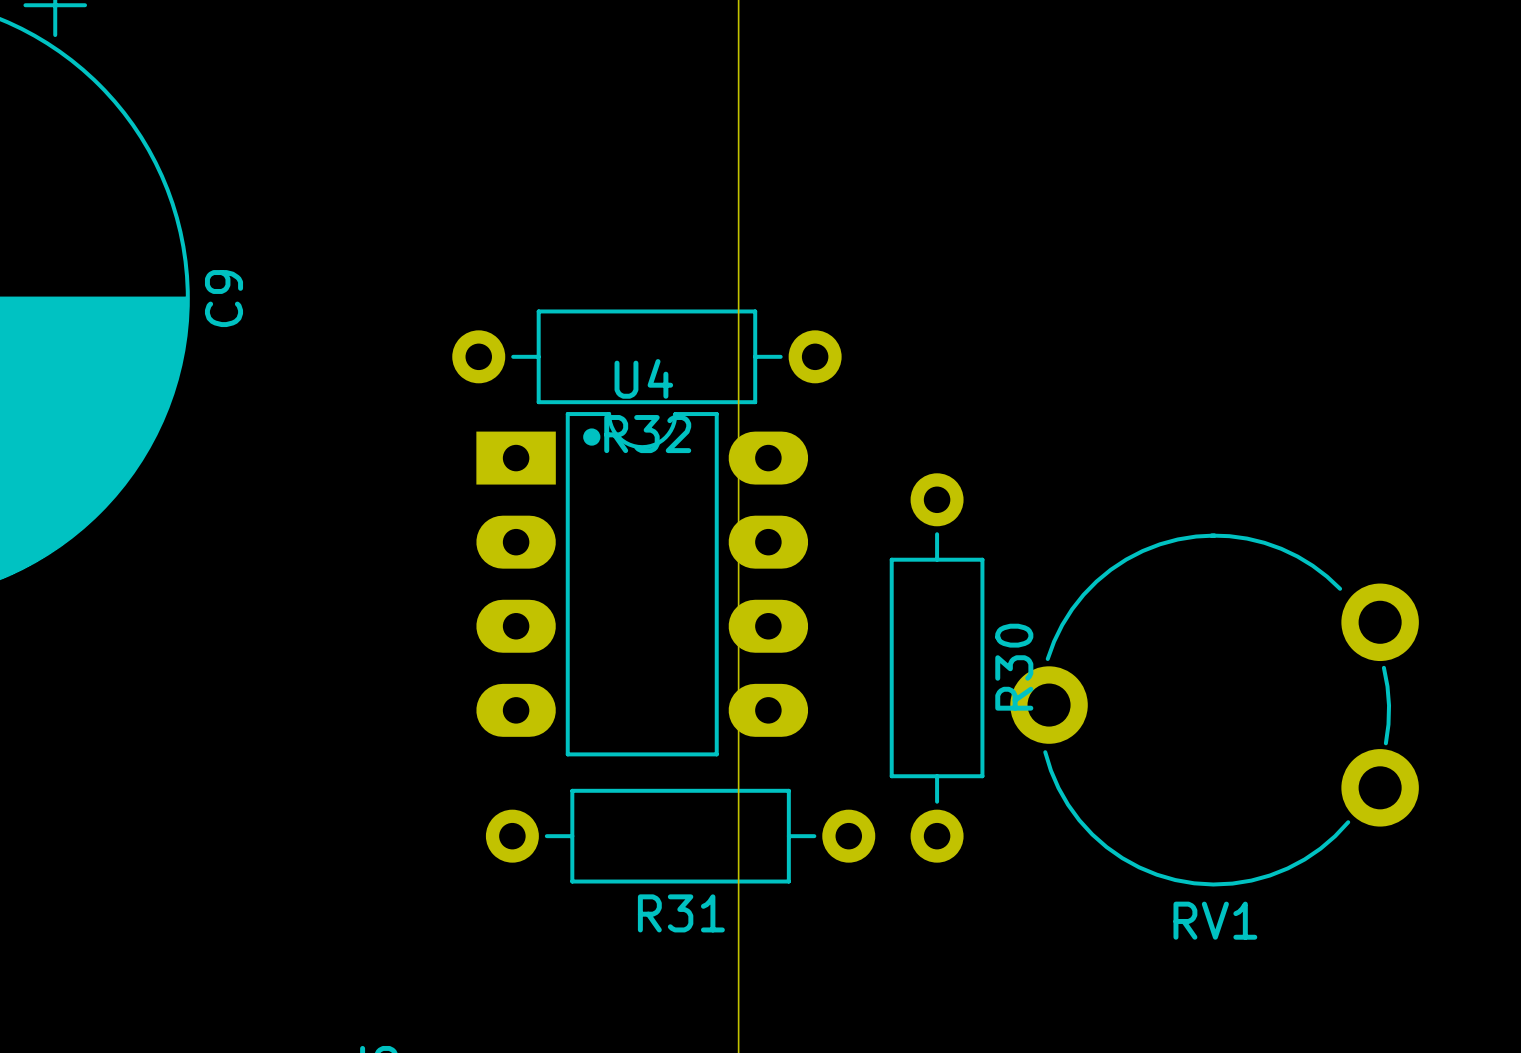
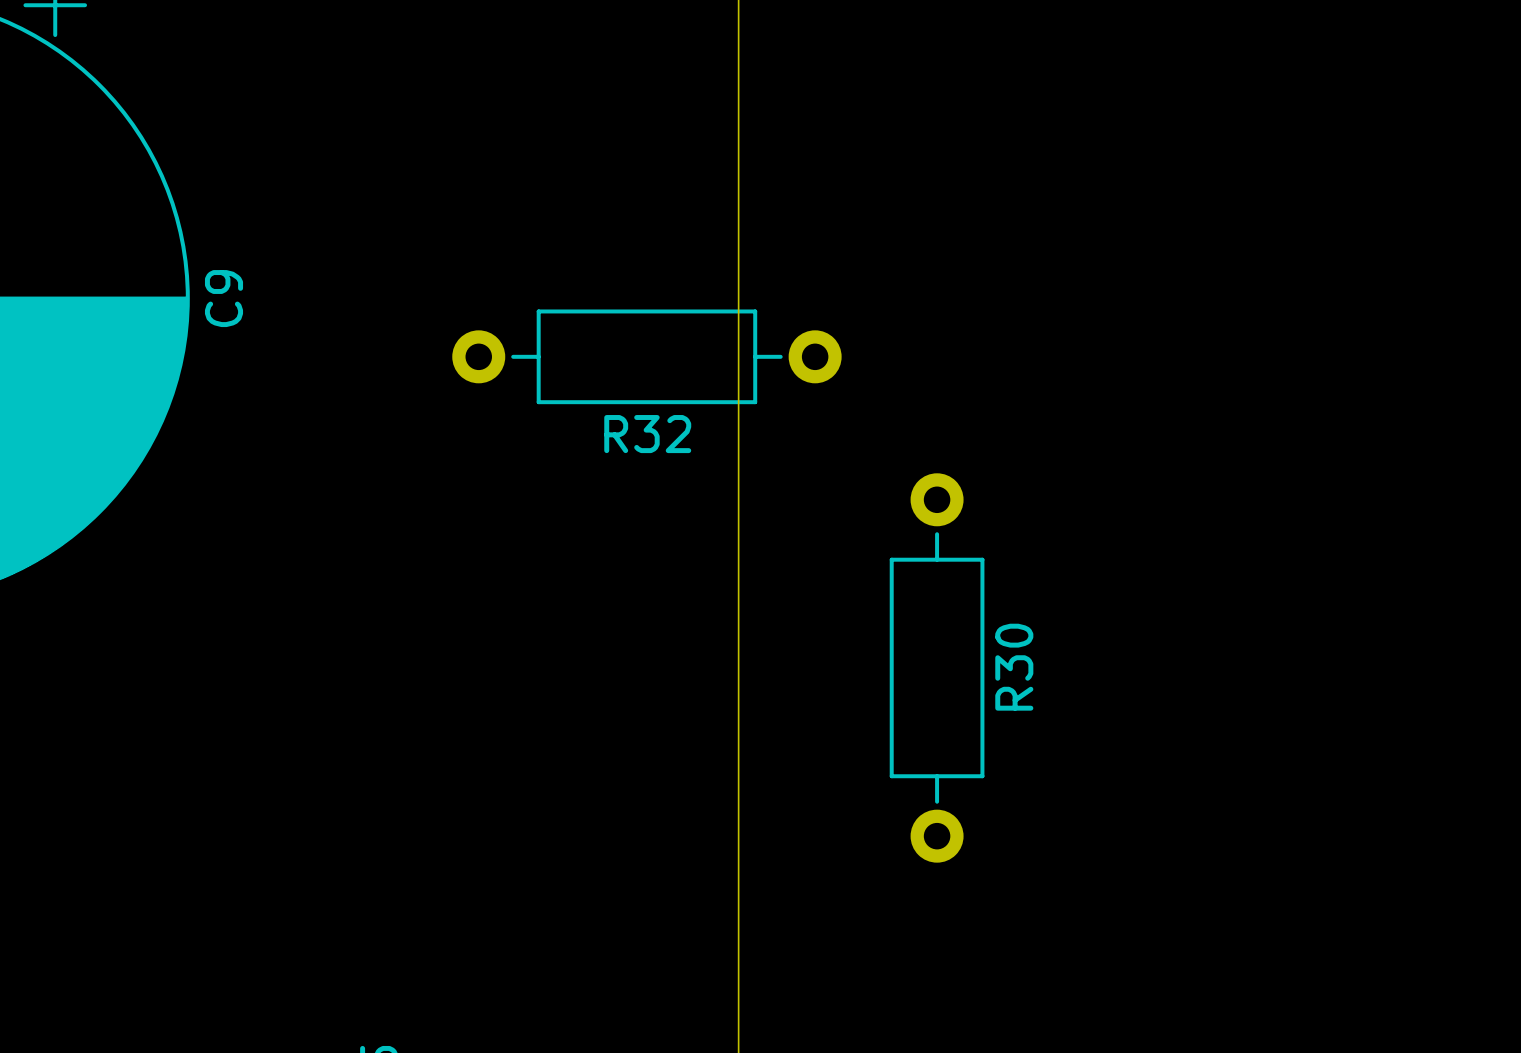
U4: (642, 584) -> none
RV1: (1214, 710) -> none
R31: (680, 836) -> none

